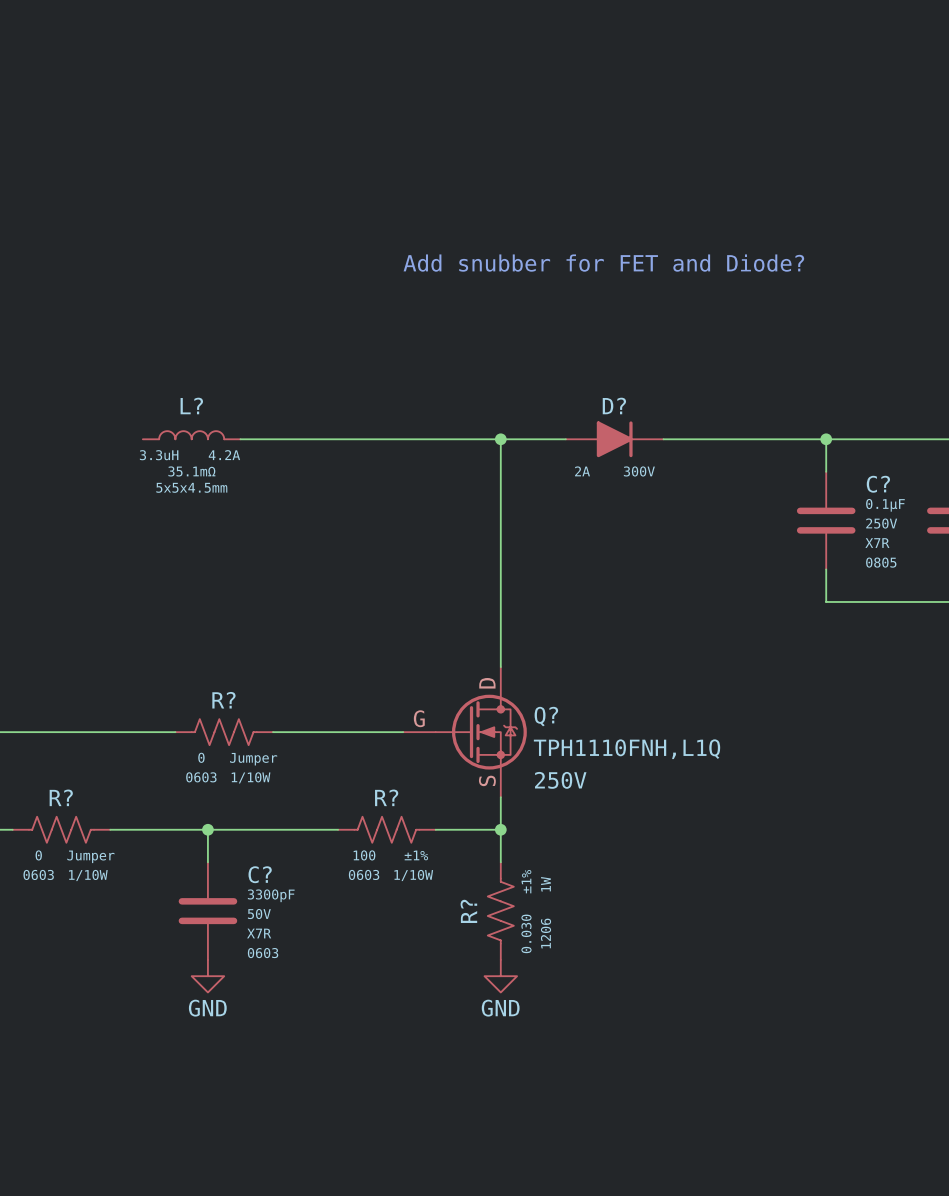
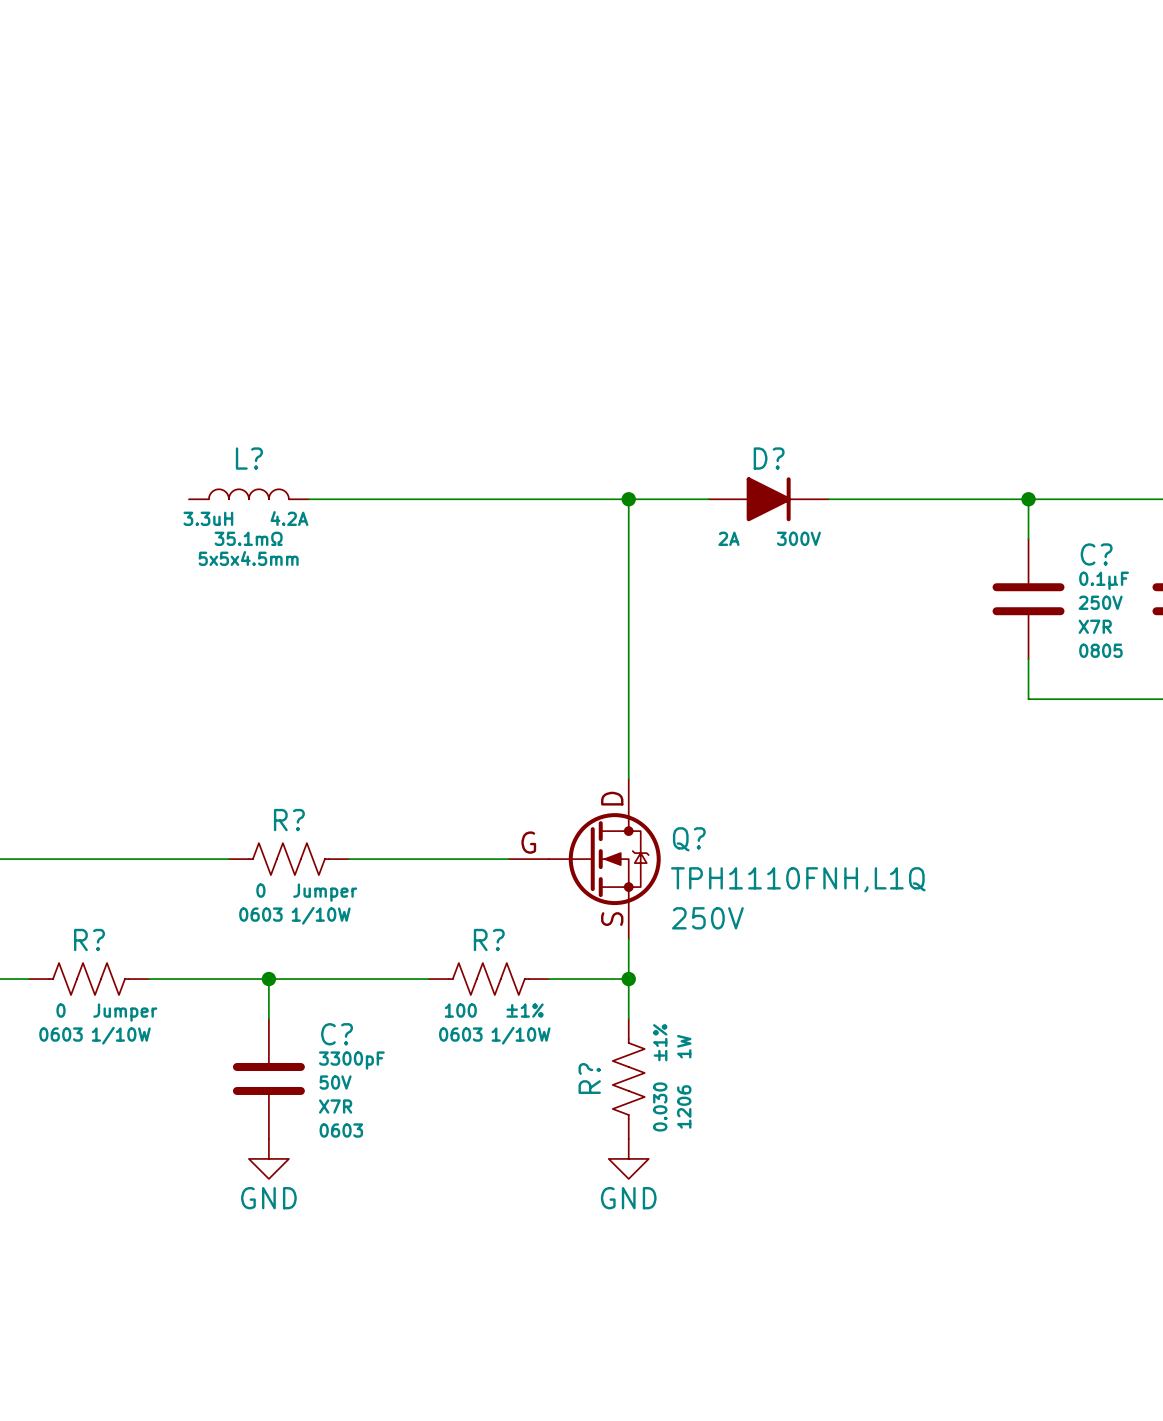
text: Add snubber for FET and Diode? (603, 263) -> none

